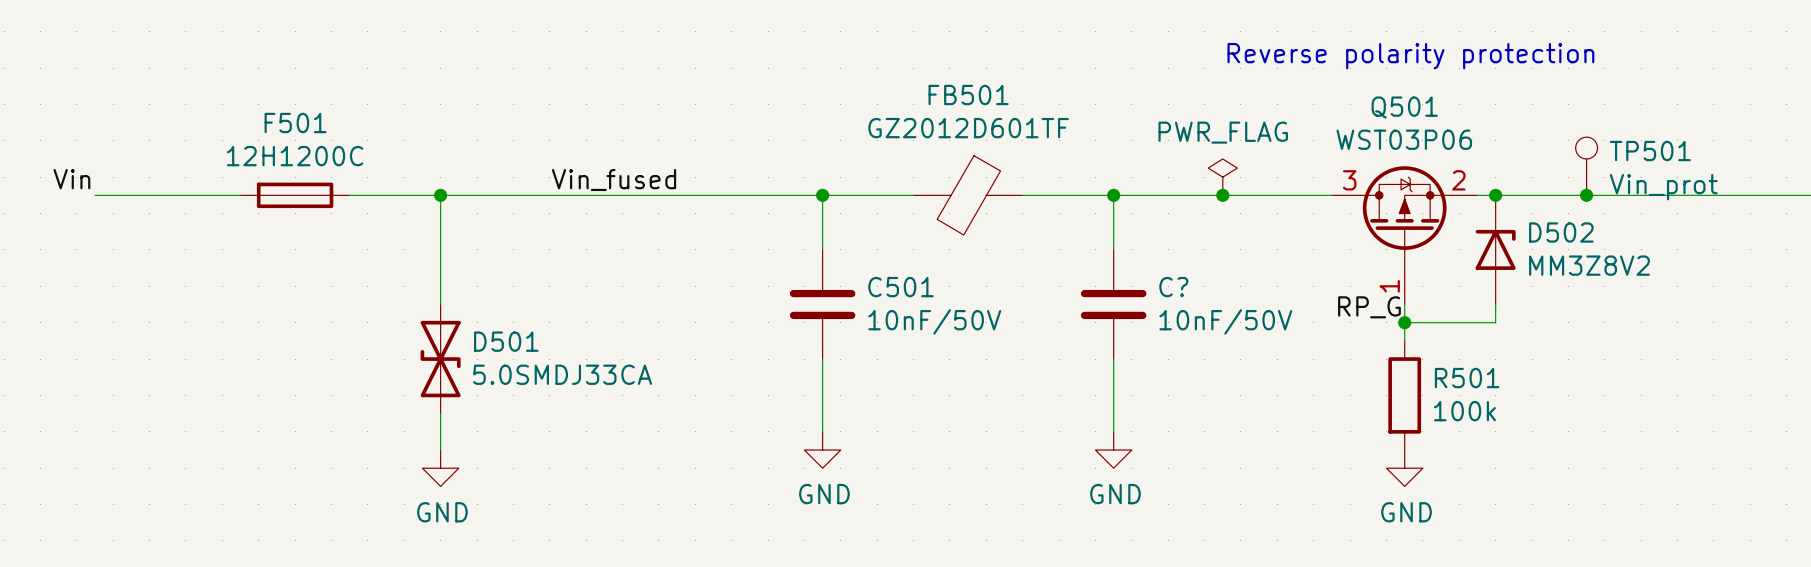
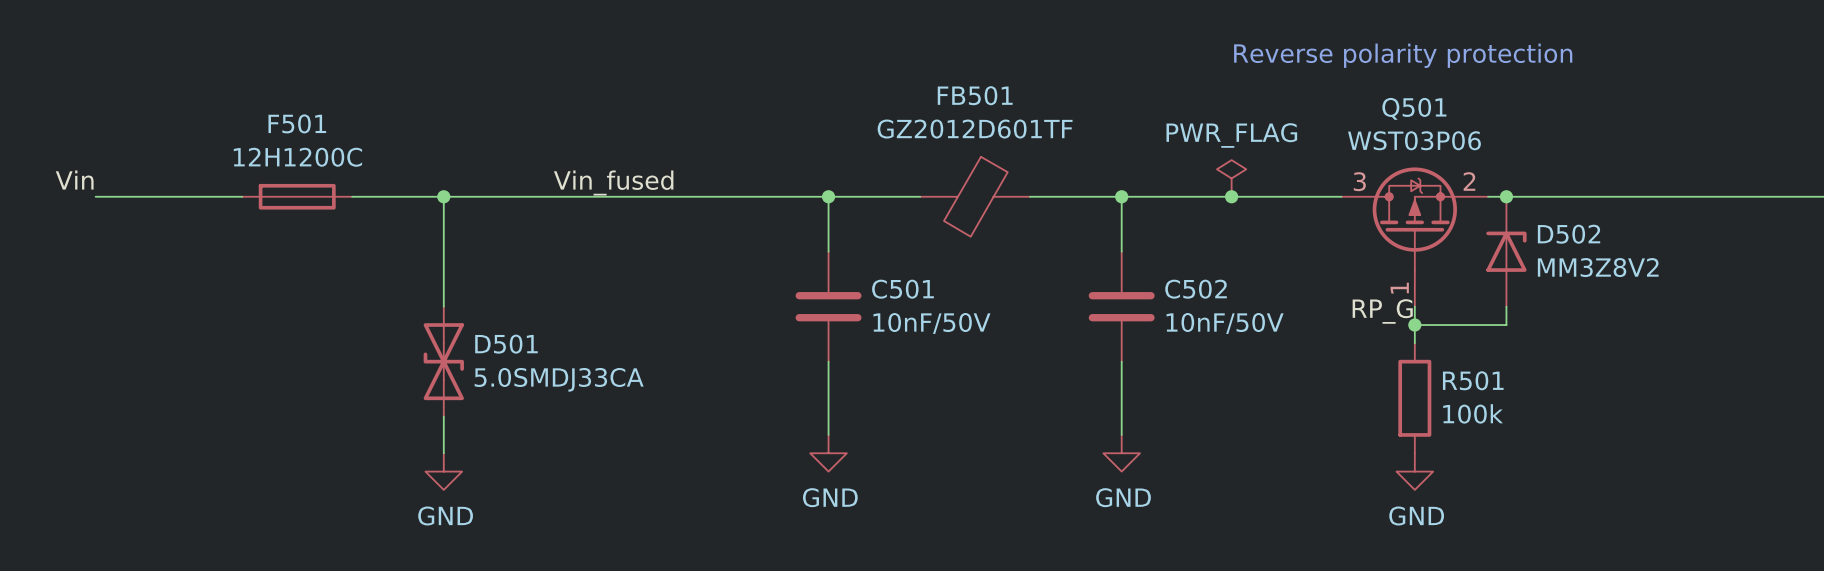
TP501: Vin_prot (1586, 166) -> none
junction: (1586, 195) -> none
C? name: C? (1173, 287) -> C502 (1196, 289)

